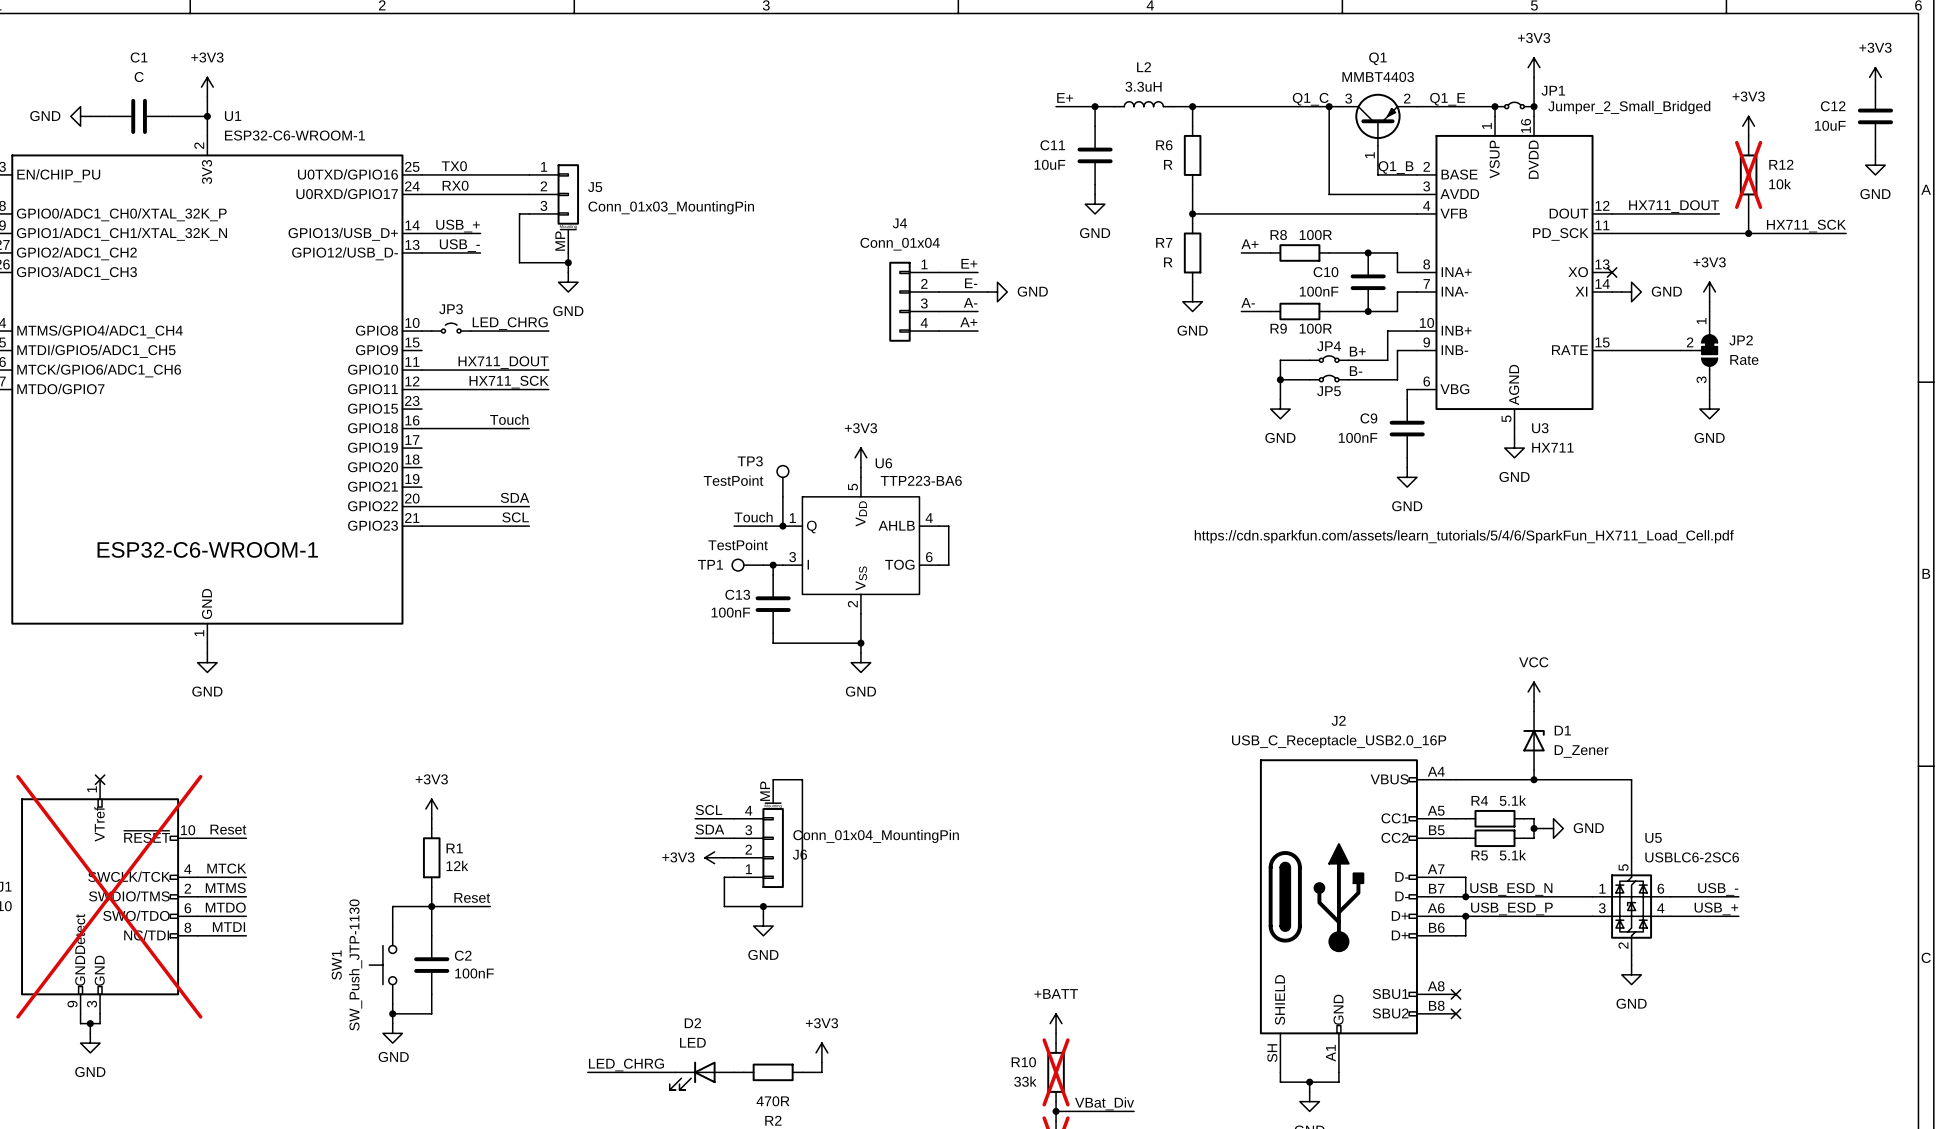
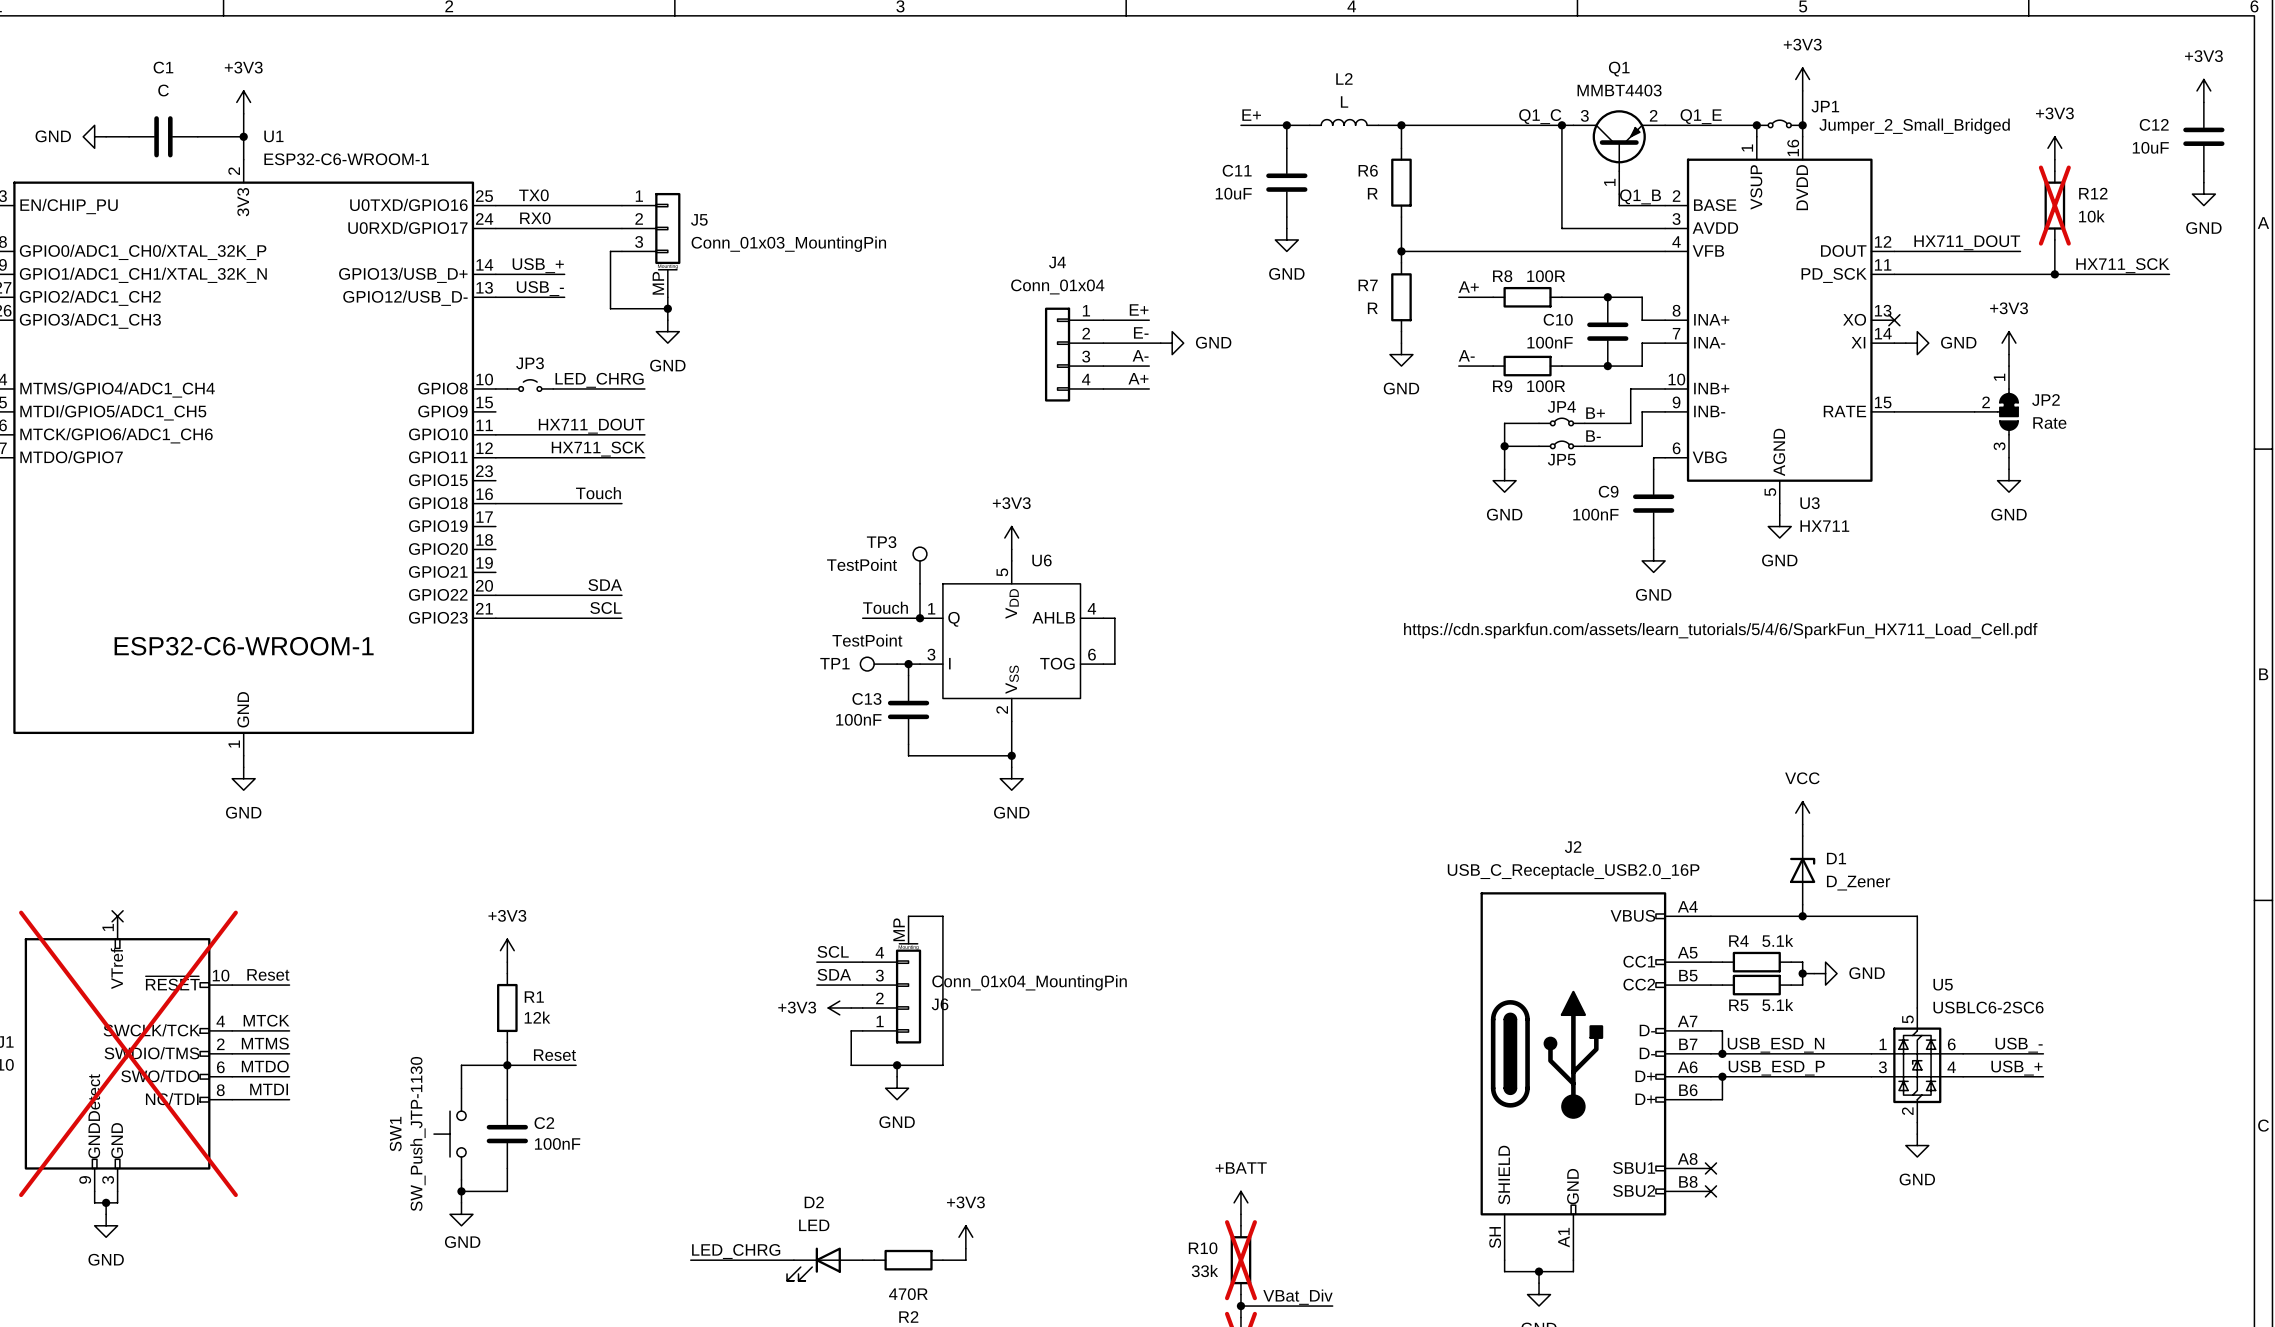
L2 value: 3.3uH (1143, 86) -> L (1344, 101)
U6 name position: U6 (883, 463) -> U6 (1041, 560)
U6 value: TTP223-BA6 (921, 480) -> none

